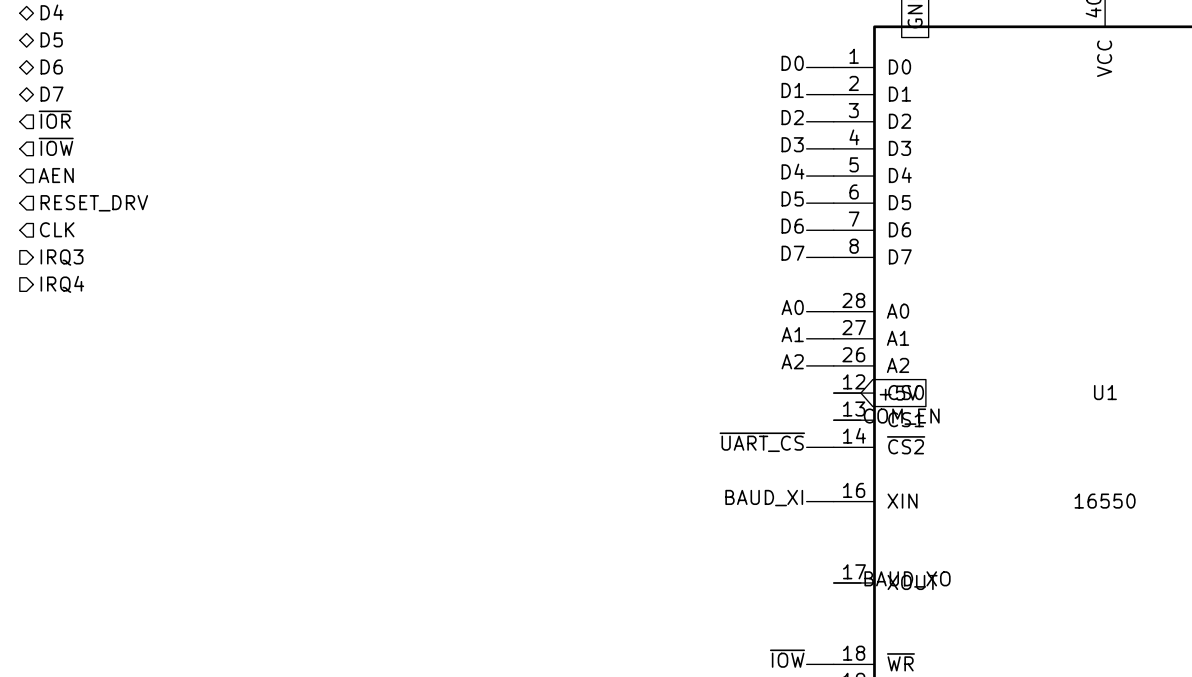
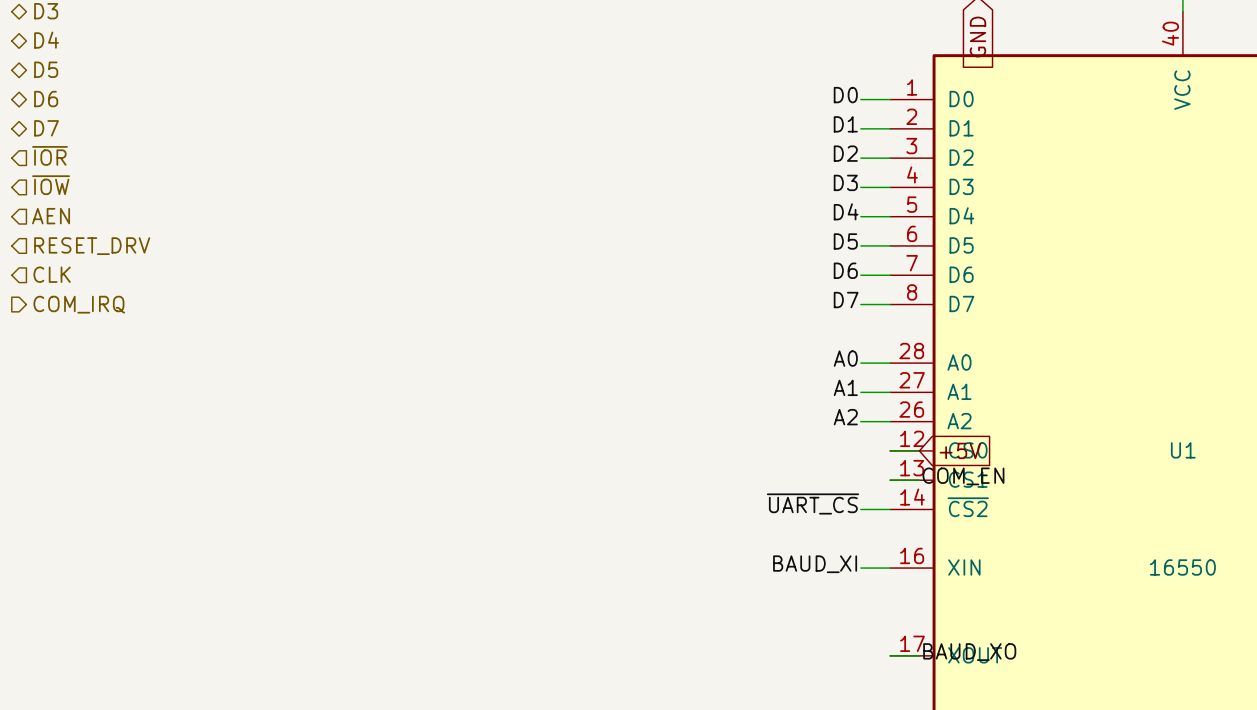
hierarchical label: IRQ3 (62, 257) -> COM_IRQ (79, 304)
hierarchical label: IRQ4 (62, 284) -> none

